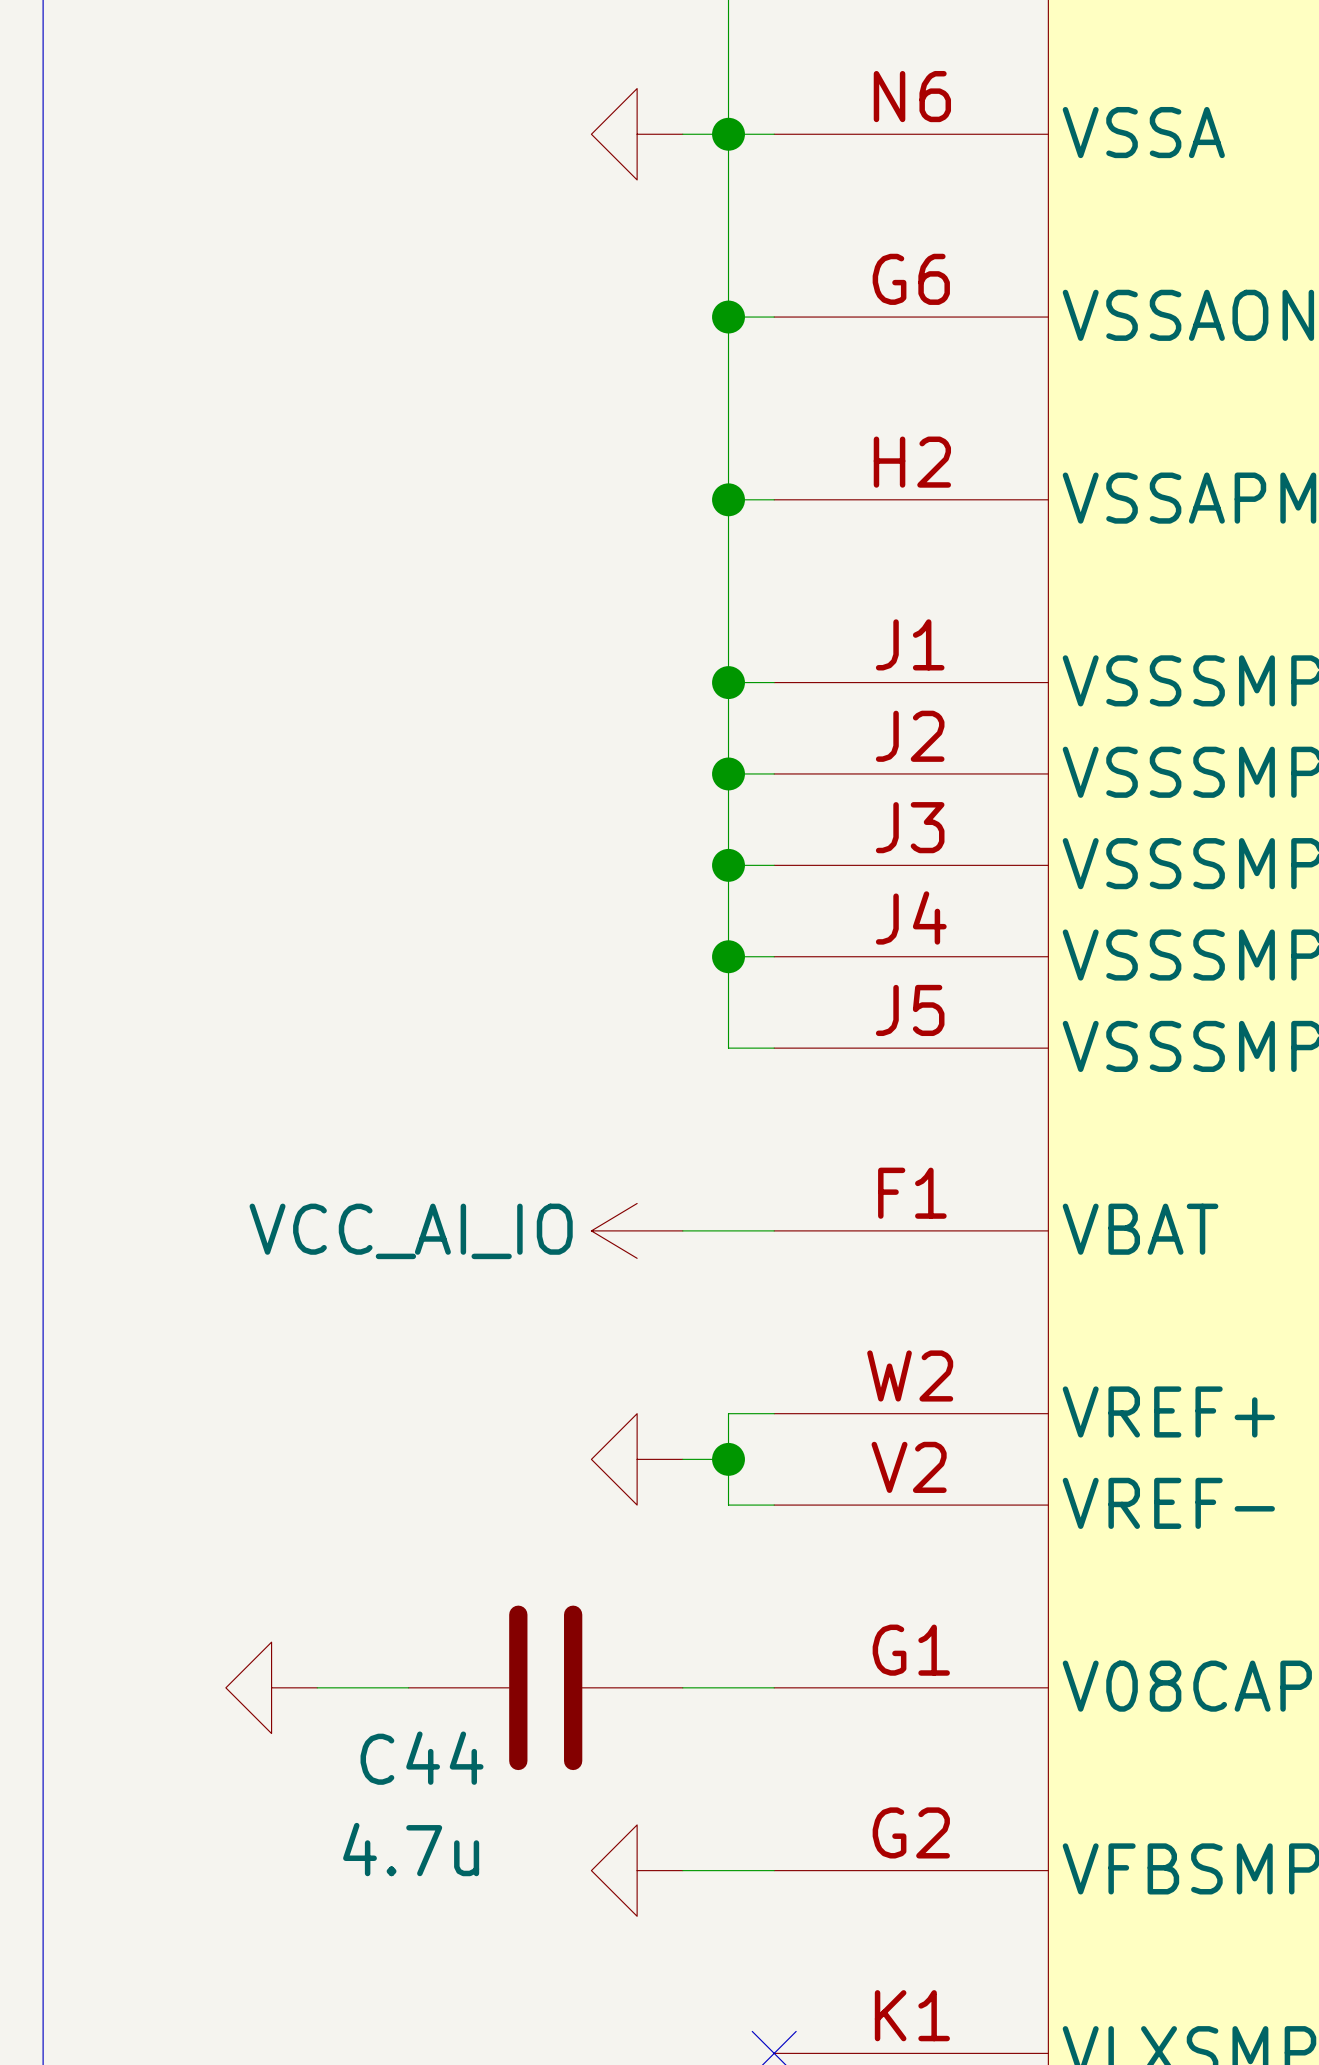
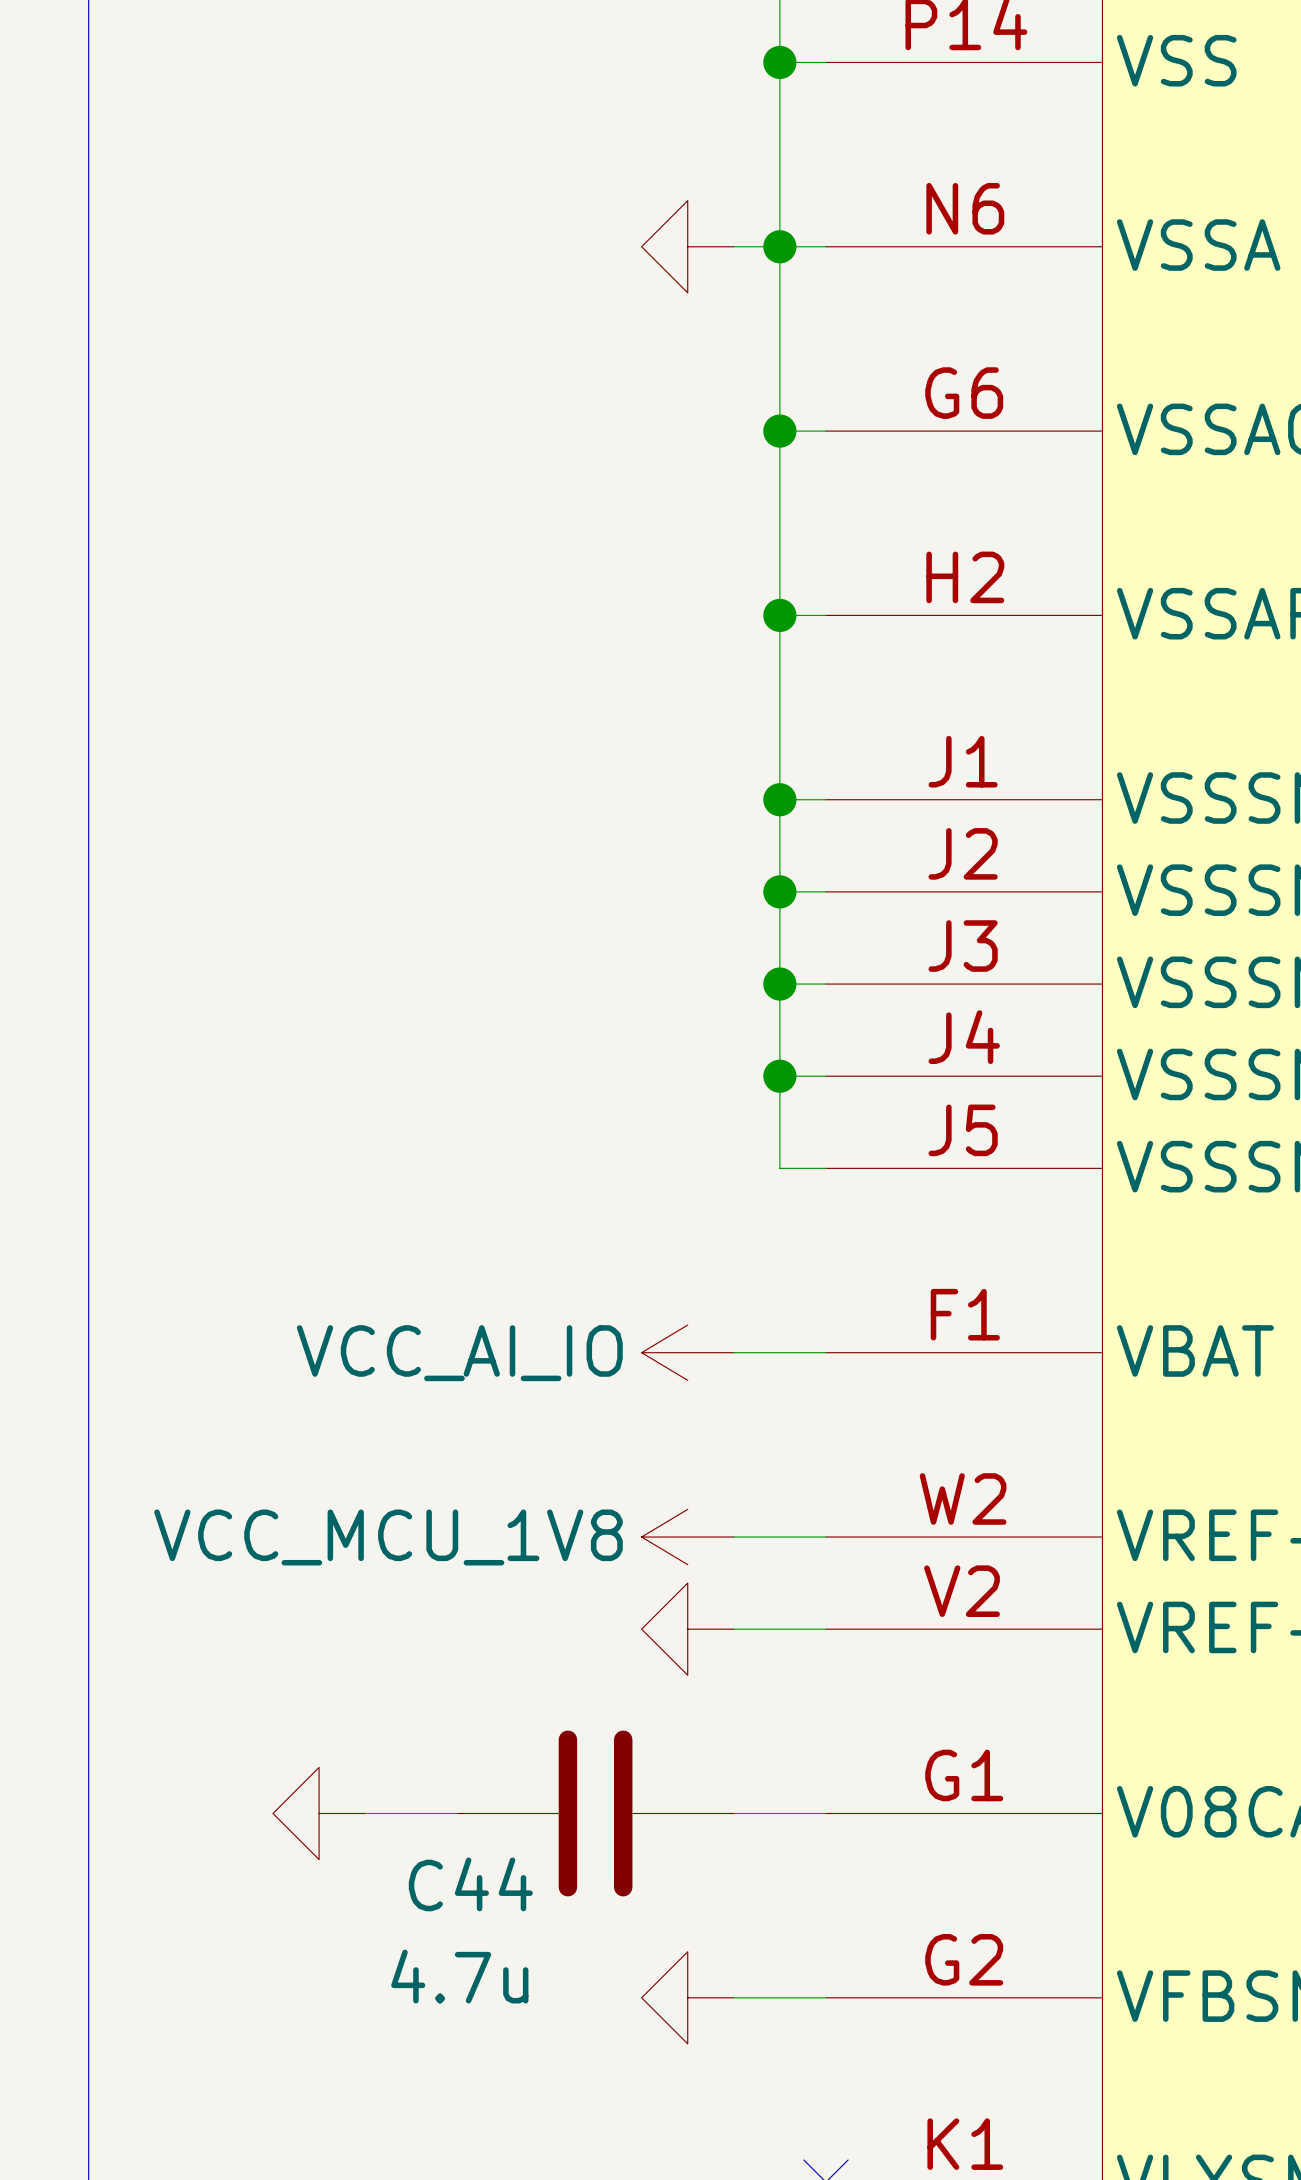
power symbol: none -> VCC_MCU_1V8 (687, 1537)
wire: (728, 1413) (728, 1505) -> (779, 1537) (733, 1537)
power symbol position: (637, 1459) -> (687, 1629)
wire: (682, 1459) (728, 1459) -> (733, 1629) (779, 1629)
junction: (728, 1459) -> none

